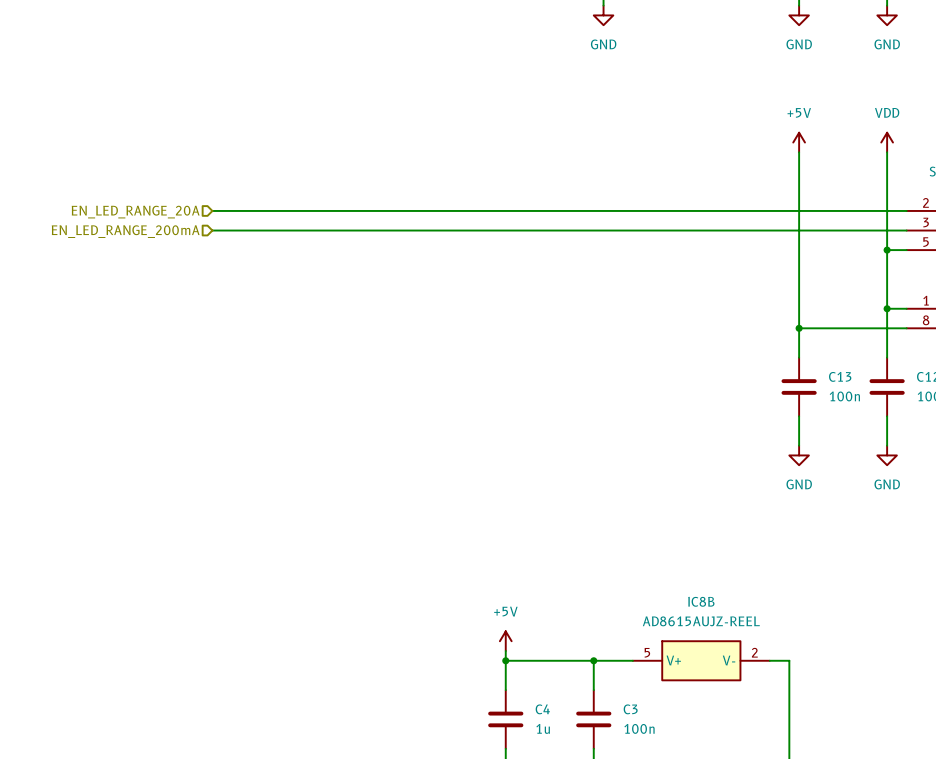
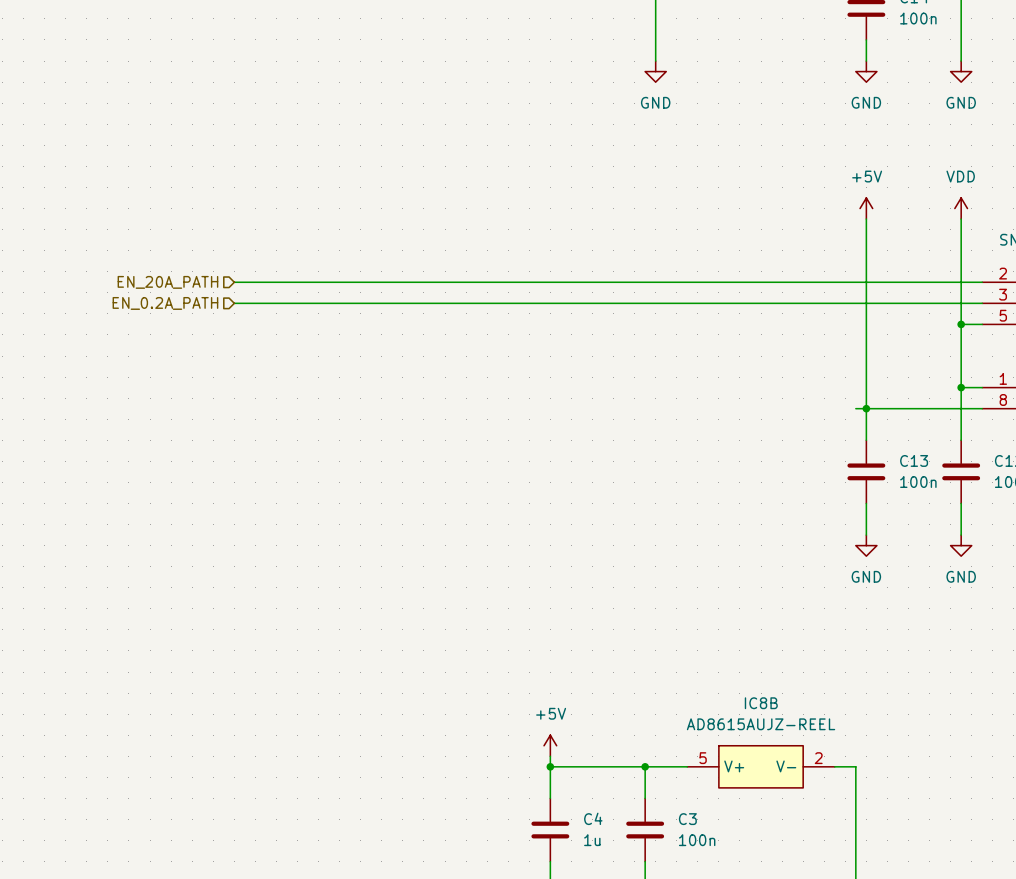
hierarchical label: EN_LED_RANGE_20A (135, 212) -> EN_20A_PATH (167, 282)
hierarchical label: EN_LED_RANGE_200mA (125, 231) -> EN_0.2A_PATH (165, 303)
wire: none -> (855, 408) (866, 408)

